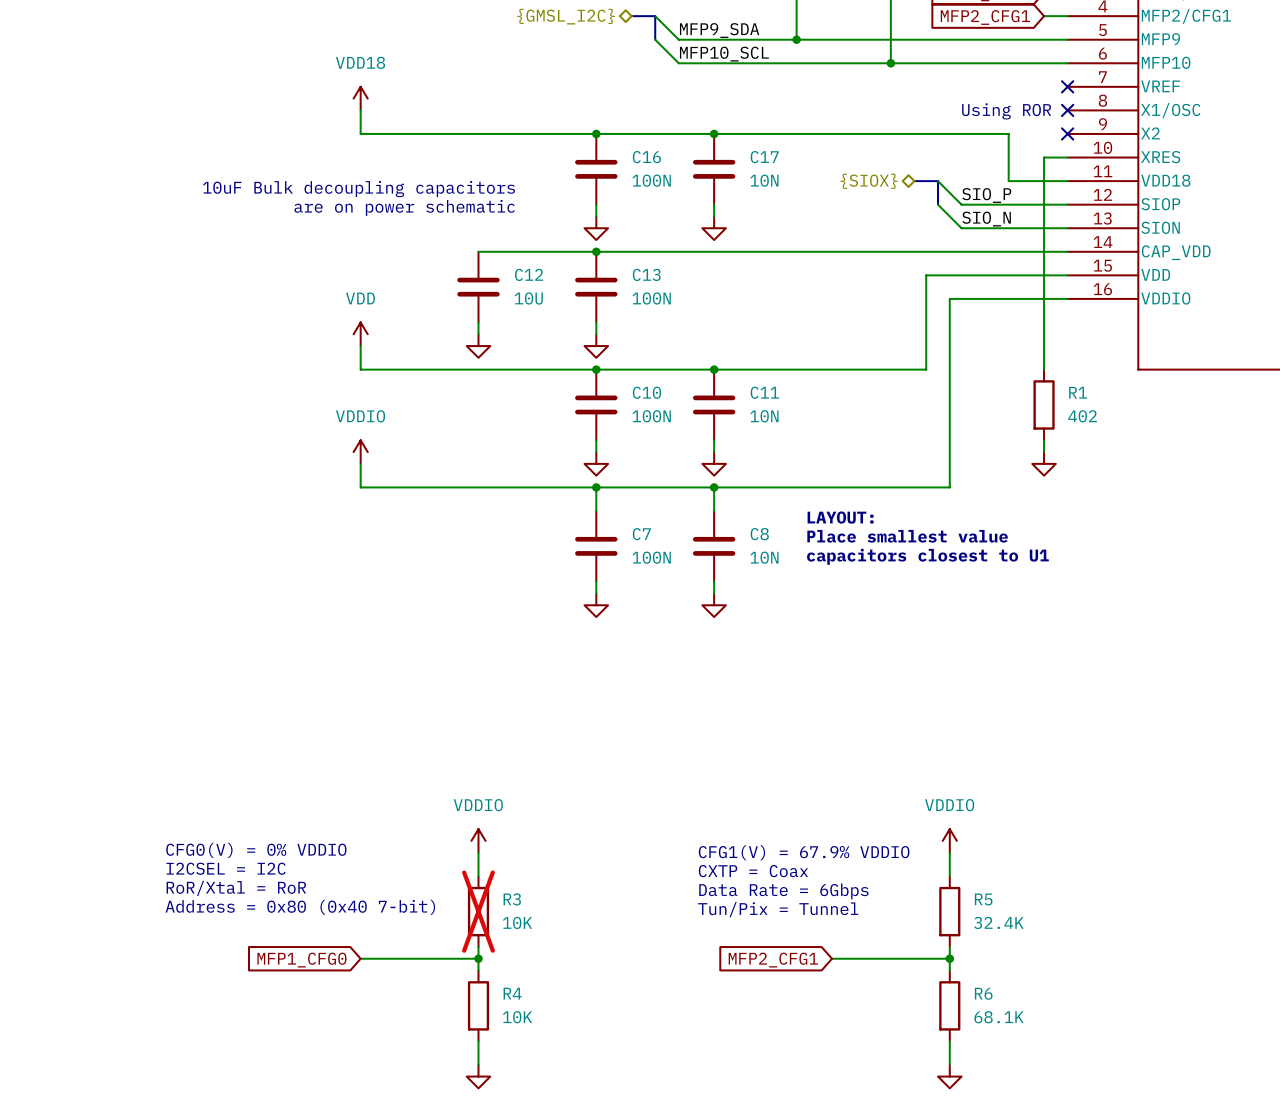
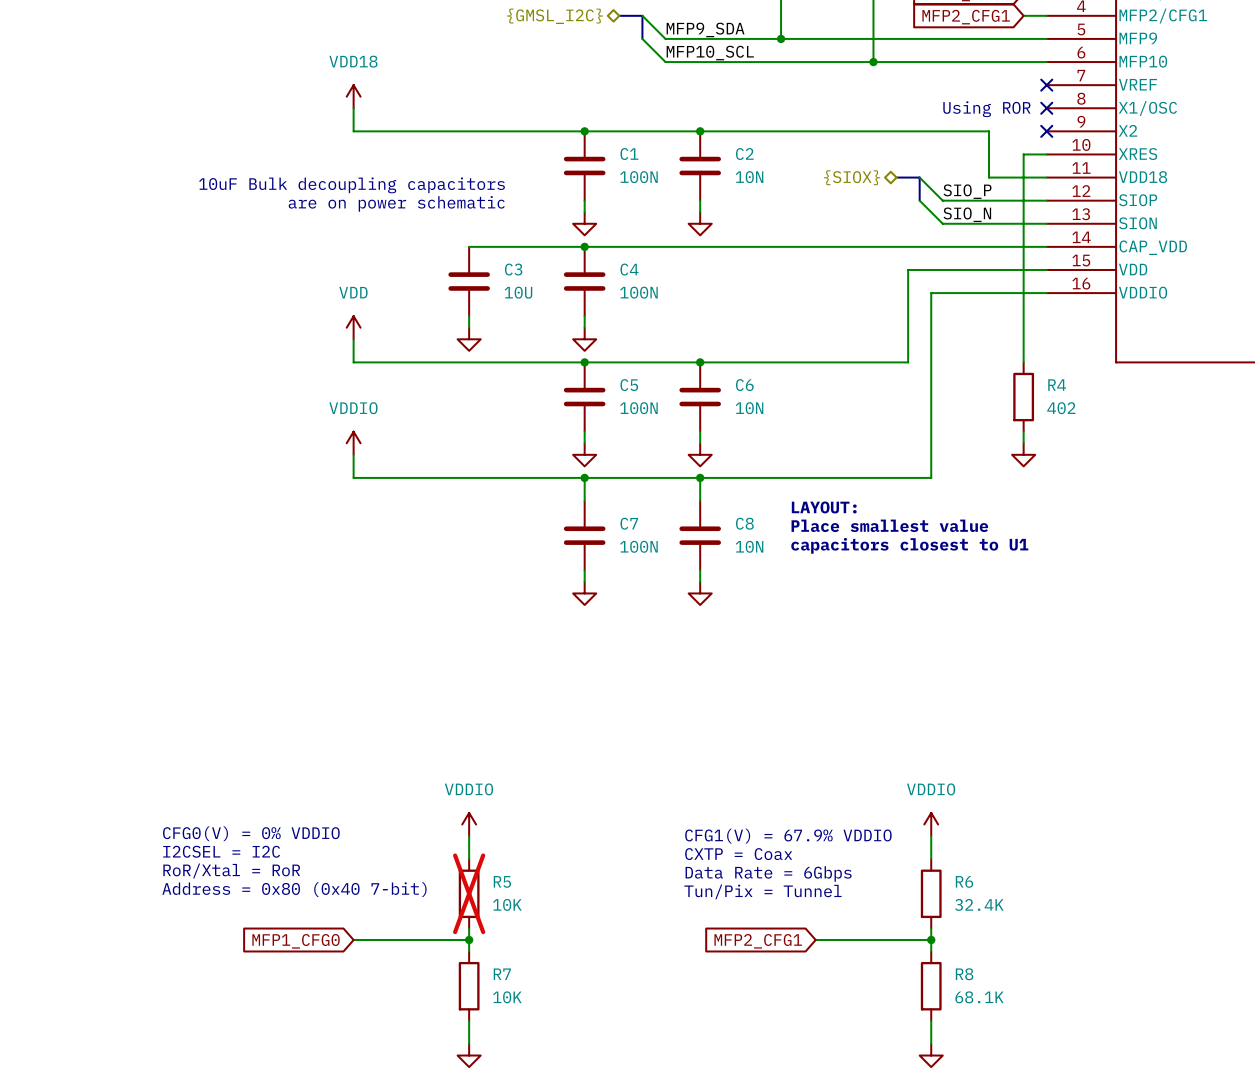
C16 name: C16 (646, 157) -> C1 (629, 154)
C17 name: C17 (764, 157) -> C2 (744, 154)
C12 name: C12 (529, 274) -> C3 (513, 269)
C13 name: C13 (646, 274) -> C4 (629, 269)
C10 name: C10 (646, 392) -> C5 (629, 385)
C11 name: C11 (764, 392) -> C6 (744, 385)
R1 name: R1 (1078, 392) -> R4 (1057, 385)
R3 name: R3 (512, 899) -> R5 (502, 881)
R5 name: R5 (983, 899) -> R6 (964, 881)
R4 name: R4 (512, 993) -> R7 (502, 974)
R6 name: R6 (983, 993) -> R8 (964, 974)

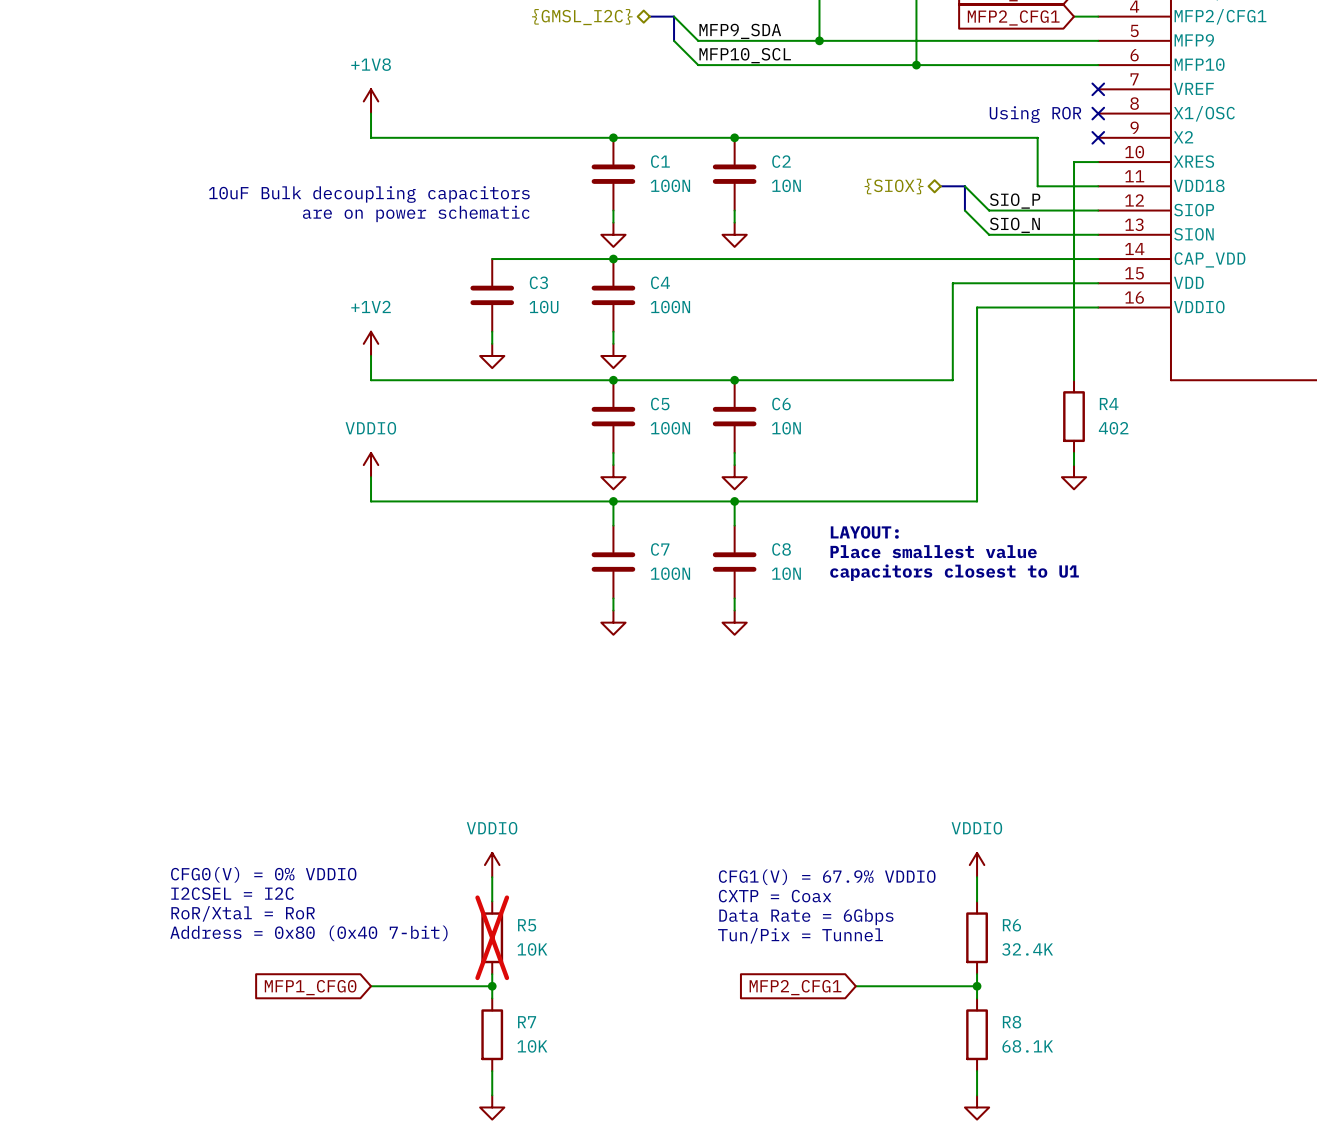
power symbol: VDD18 (353, 96) -> +1V8 (371, 101)
power symbol: VDD (353, 327) -> +1V2 (371, 343)

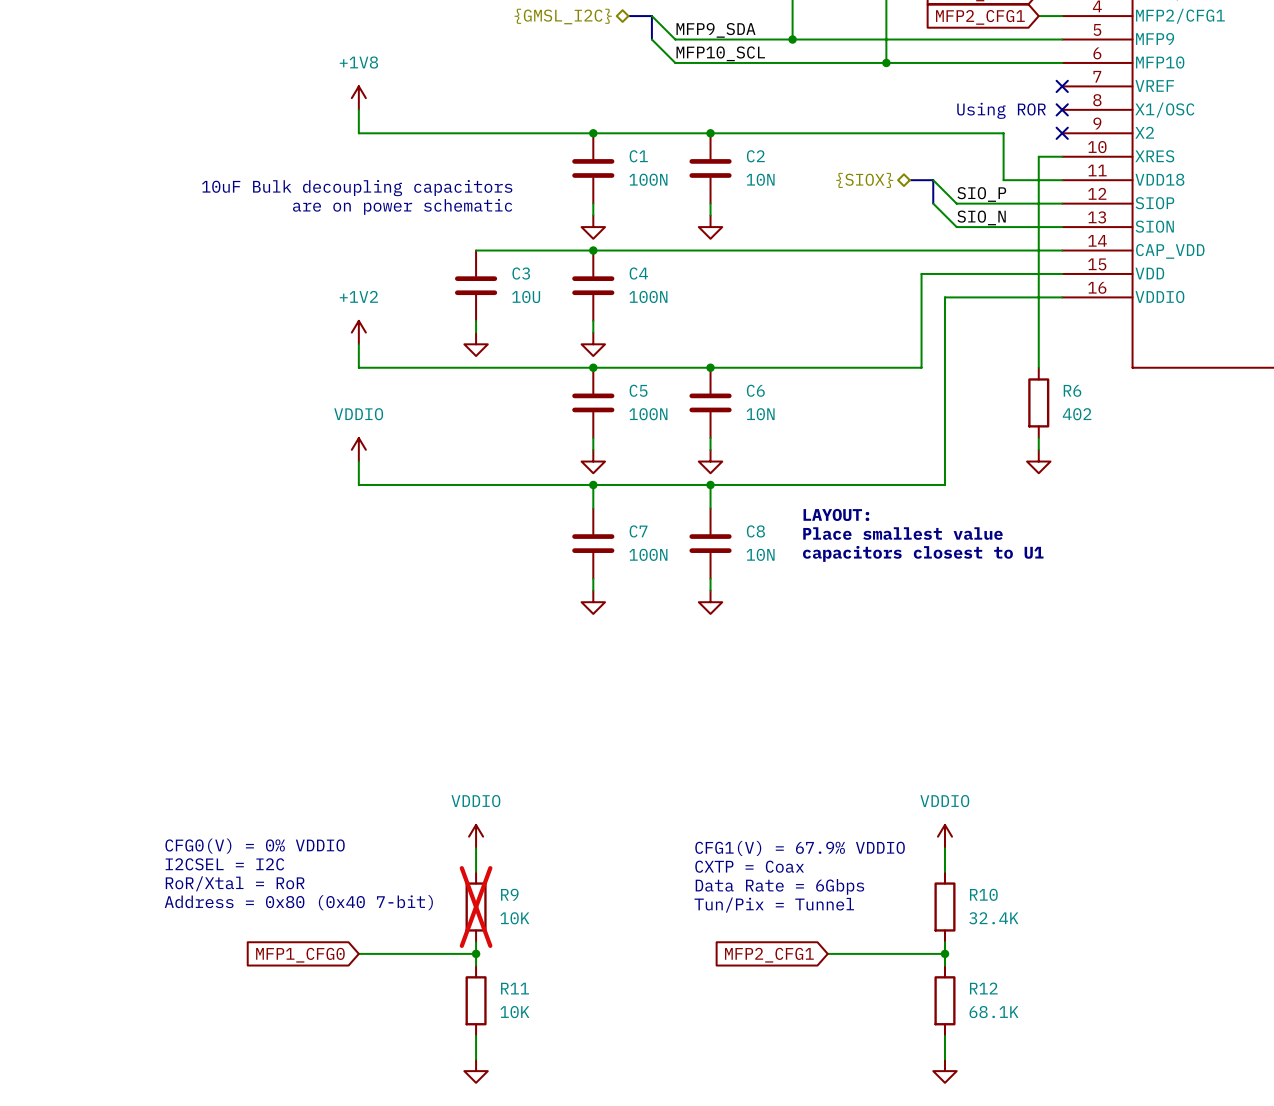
R4 name: R4 (1109, 404) -> R6 (1072, 390)
R5 name: R5 (527, 925) -> R9 (509, 894)
R6 name: R6 (1011, 925) -> R10 (983, 894)
R7 name: R7 (527, 1022) -> R11 (515, 988)
R8 name: R8 (1012, 1022) -> R12 (983, 988)

